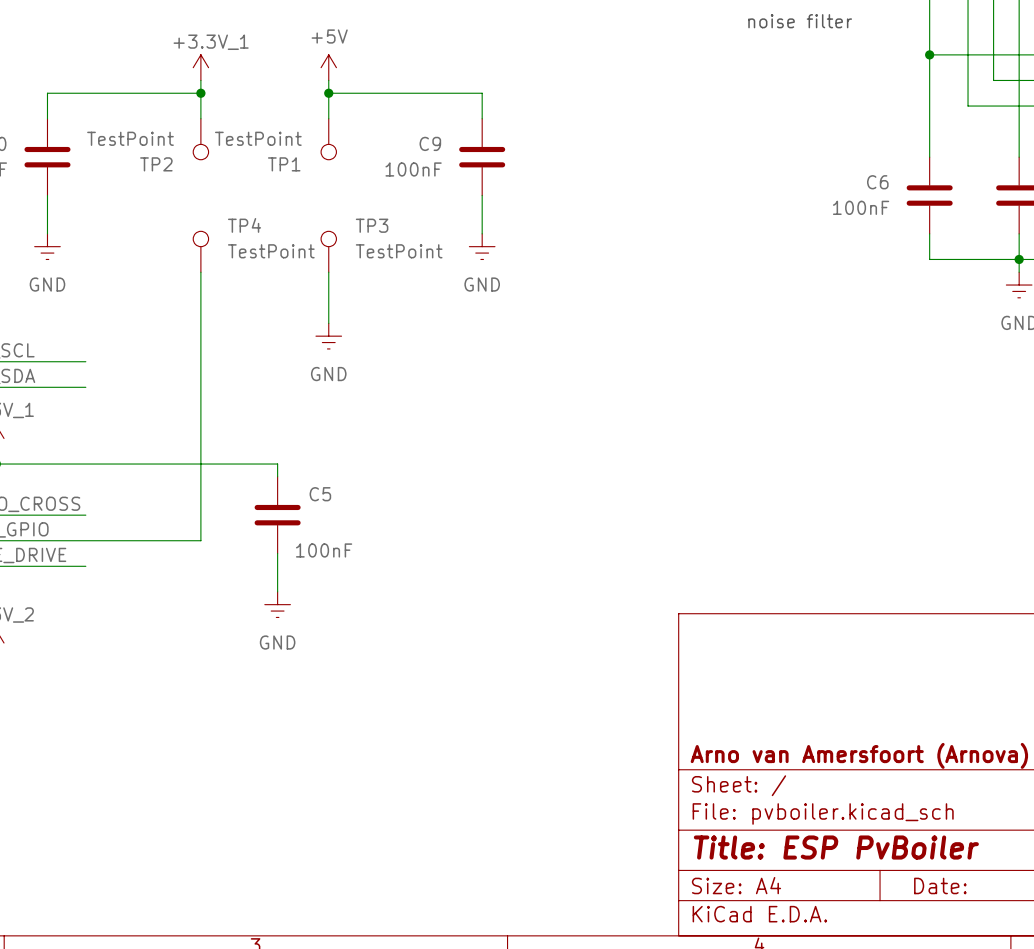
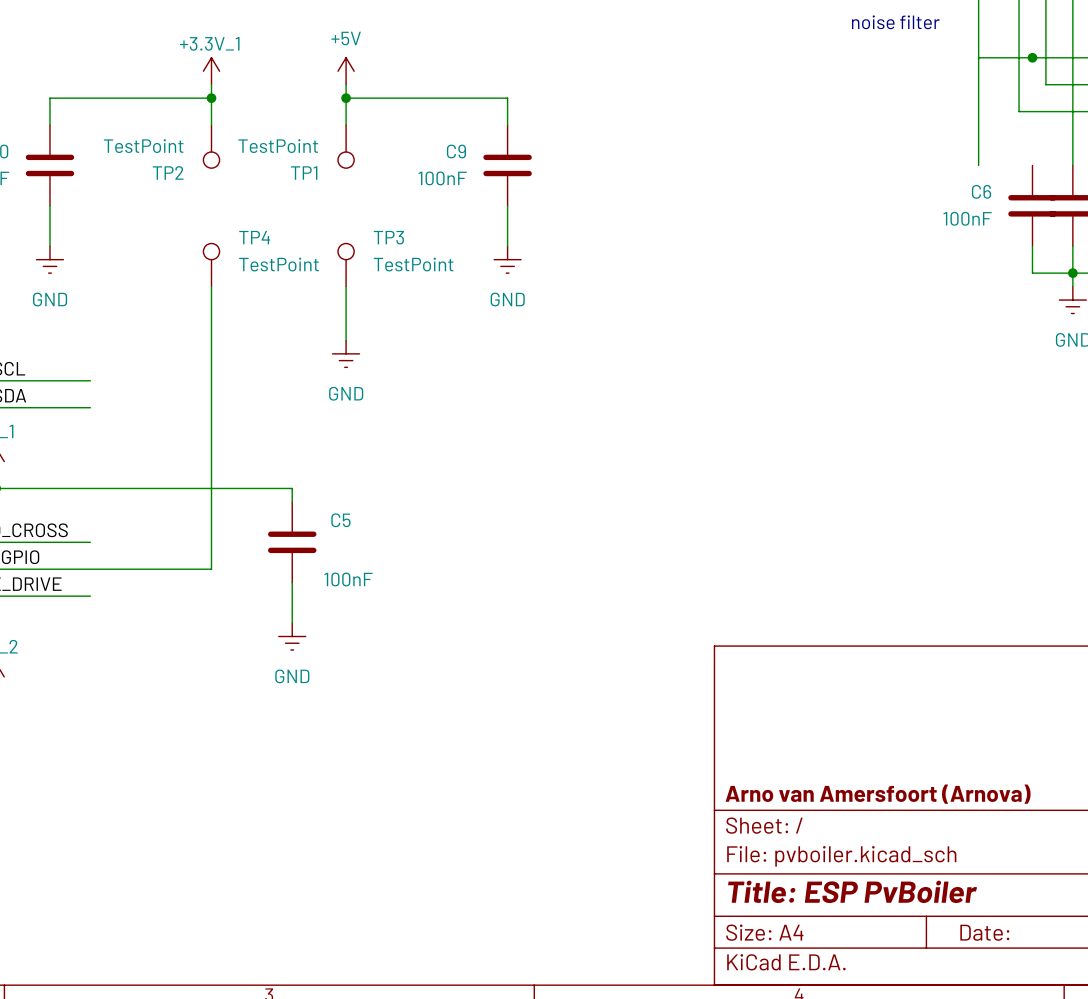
text position: noise filter (800, 21) -> noise filter (895, 22)
junction: (929, 54) -> none
junction: none -> (1032, 57)
C6 position: (929, 195) -> (1032, 205)
wire: (929, 233) (929, 259) (980, 259) -> (1032, 246) (1032, 273)

